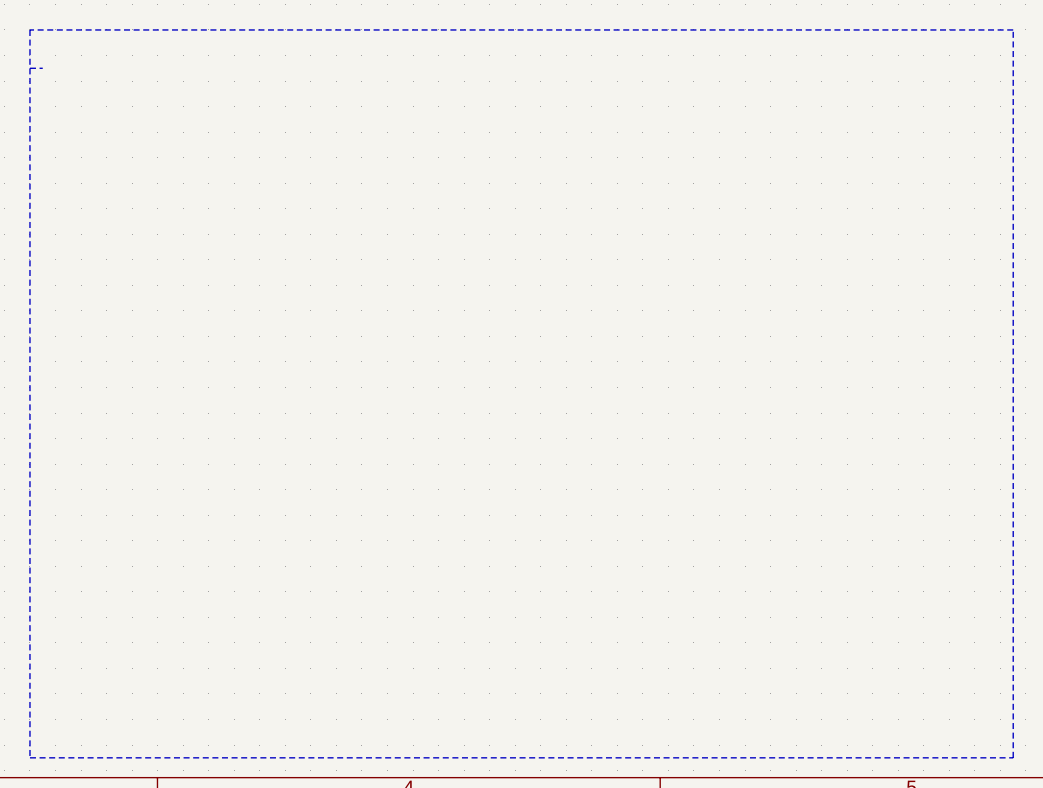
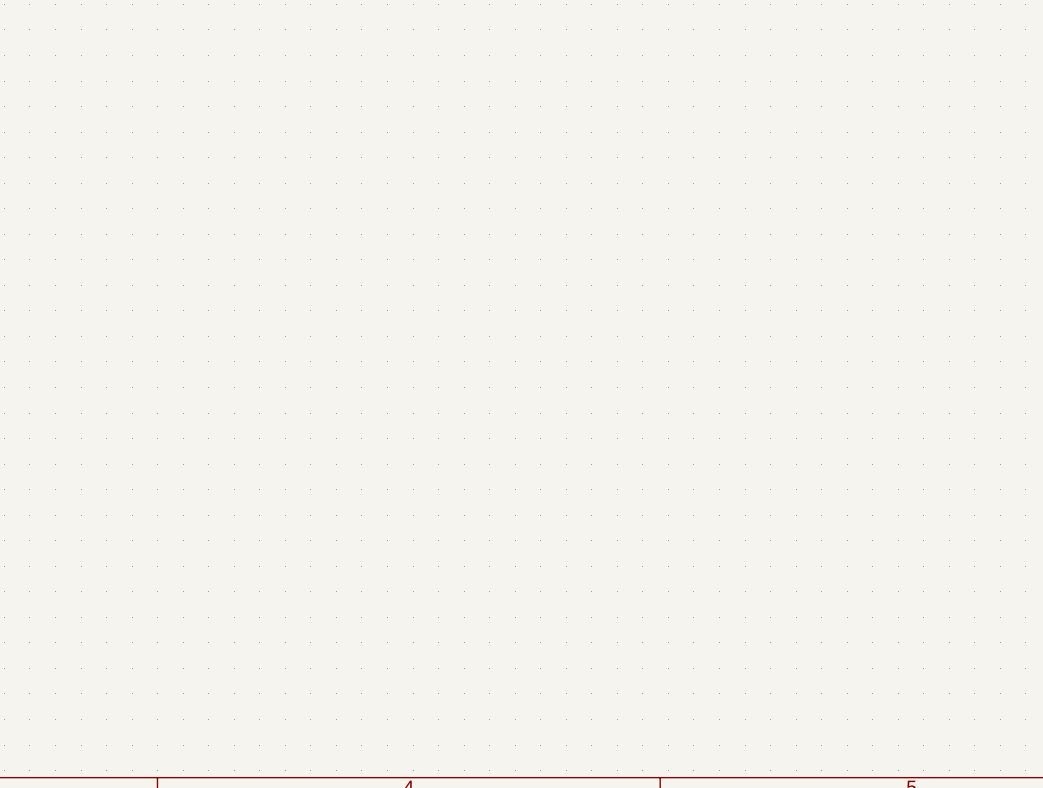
line: (29, 29) (1013, 29) (1013, 757) (29, 757) (29, 29) -> none
line: (29, 68) (42, 68) -> none

